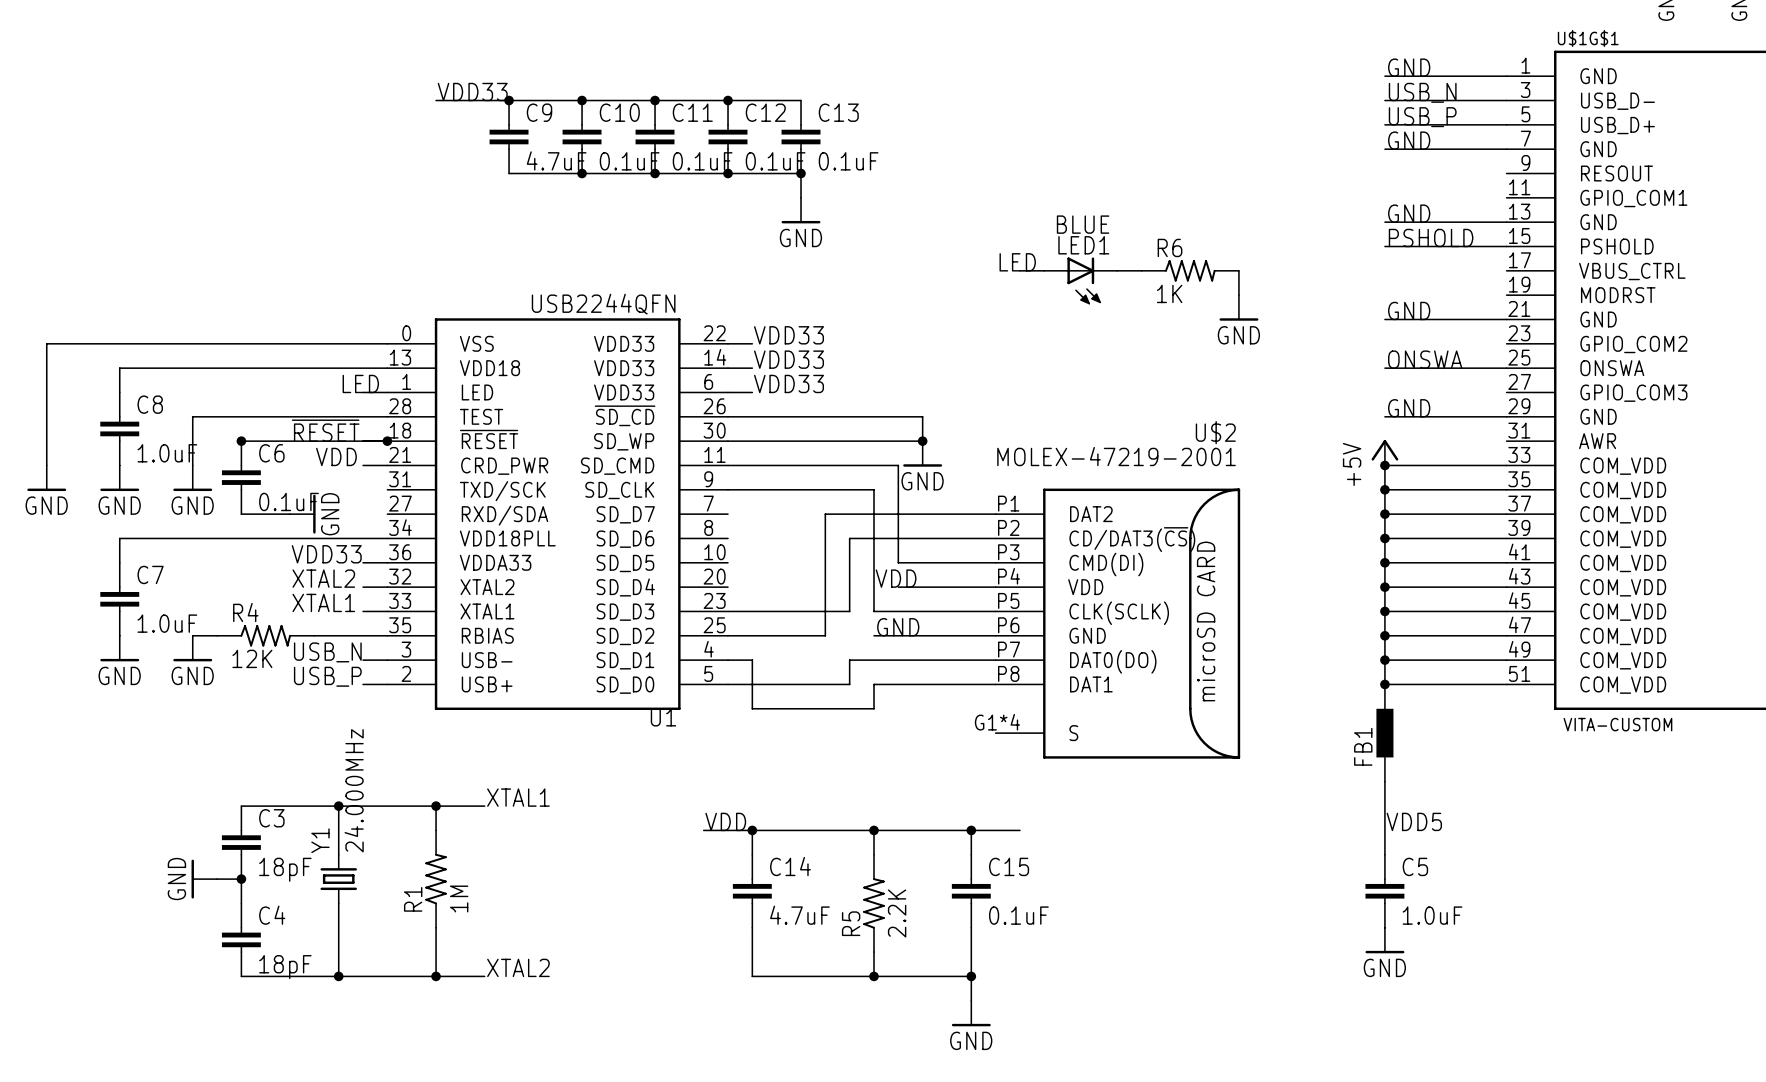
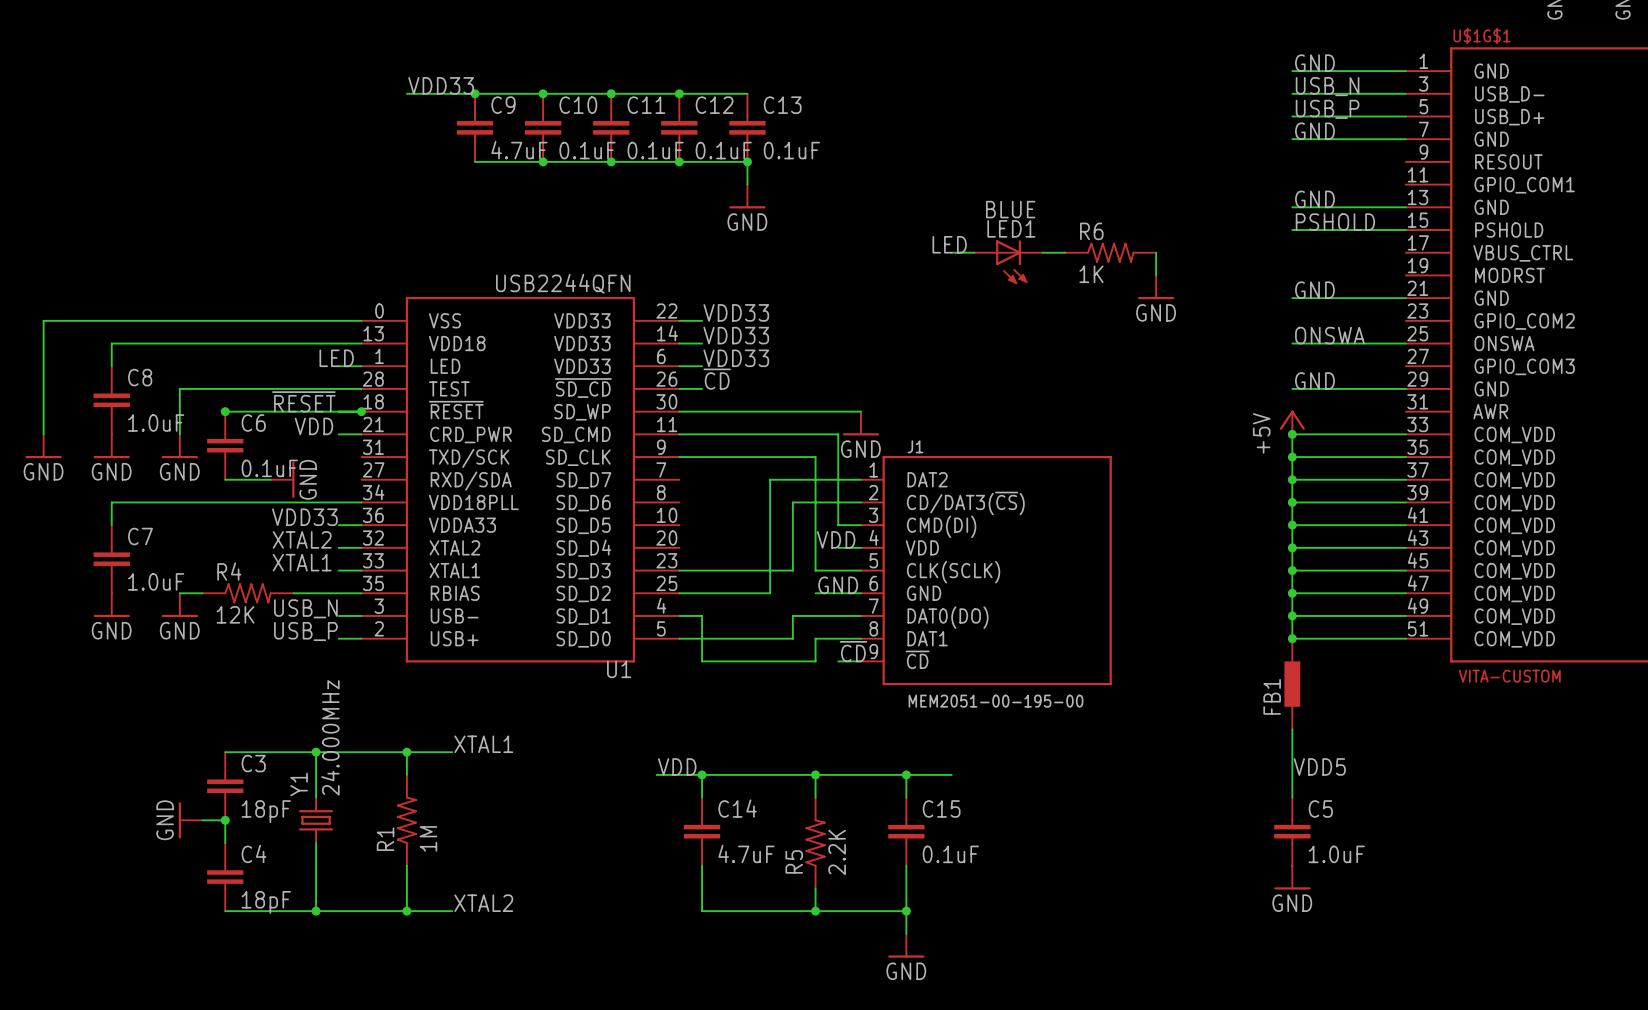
label: none -> ~{CD} (717, 379)
wire: (752, 416) (922, 416) (922, 441) -> none
junction: (922, 441) -> none
wire: (922, 514) (995, 514) -> none
wire: (922, 538) (995, 538) -> none
wire: (922, 562) (995, 562) -> none
wire: (922, 587) (995, 587) -> none
wire: (922, 611) (995, 611) -> none
J1: none -> MEM2051-00-195-00 (986, 570)
U$2: MOLEX-47219-2001 (1117, 623) -> none
wire: (922, 635) (995, 635) -> none
wire: (922, 660) (995, 660) -> none
wire: (922, 684) (995, 684) -> none
label: none -> ~{CD} (853, 651)
wire: none -> (838, 661) (860, 661)

